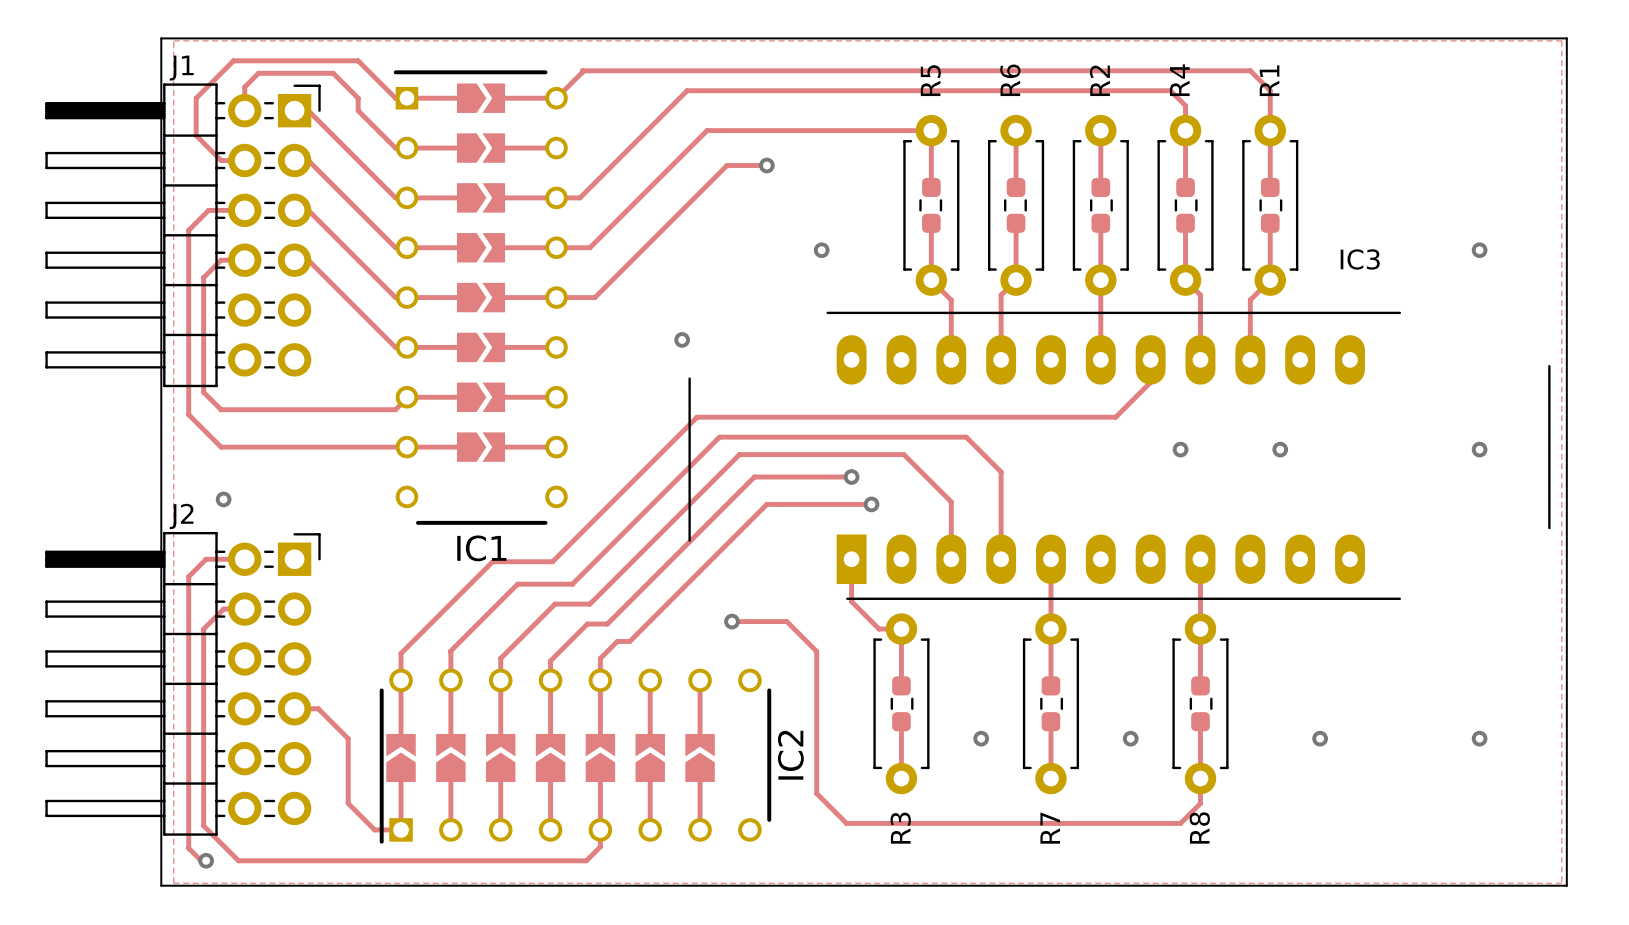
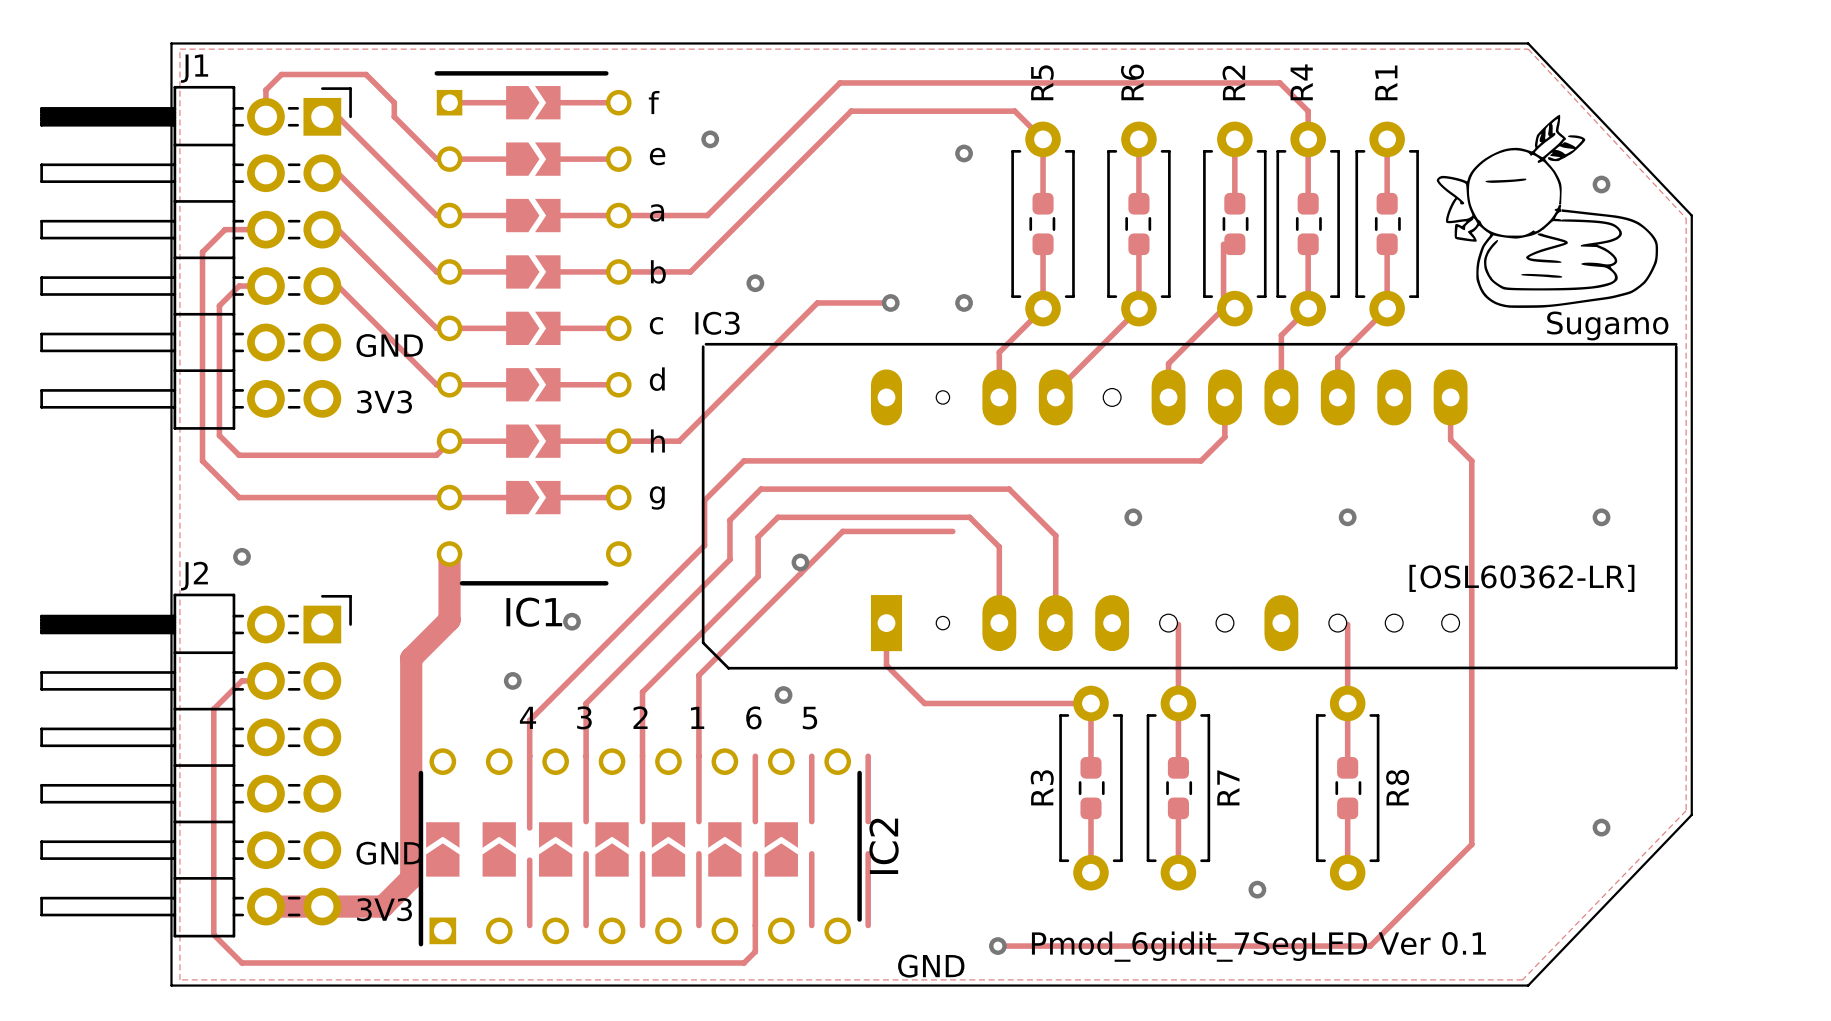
zone outline: (173, 40) (1561, 40) (1561, 883) (173, 883) (173, 40) -> (179, 49) (179, 979) (1522, 979) (1686, 810) (1686, 218) (1528, 49) (179, 49)
board edge: (161, 45) (161, 38) (1566, 38) (1566, 885) (161, 885) (161, 878) -> (171, 43) (1528, 43) (1691, 215) (1691, 814) (1528, 985) (171, 985)
track: (406, 98) (395, 98) (358, 60) (233, 60) (196, 98) (196, 135) (221, 160) (244, 160) -> none
track: (556, 98) (582, 70) (1250, 70) (1270, 90) (1270, 187) -> none
text: none -> f (654, 102)
drawing: none -> [1436, 114, 1659, 308]
via: none -> (710, 139)
track: (931, 130) (707, 130) (589, 247) -> (1043, 139) (1014, 111) (851, 111) (690, 271) (656, 271)
track: none -> (1387, 139) (1387, 203)
via: none -> (964, 153)
text: none -> e (657, 156)
track: (766, 165) (726, 165) (594, 297) (556, 297) -> none
via: (766, 165) -> none
track: (1185, 187) (1185, 105) (1170, 90) (687, 90) (579, 197) -> (1308, 203) (1308, 111) (1279, 82) (839, 82) (707, 215) (645, 215)
text: none -> a (657, 212)
R4 position: (1185, 205) -> (1308, 223)
R1 position: (1270, 205) -> (1387, 223)
track: none -> (1223, 244) (1223, 308) (1168, 363) (1168, 397)
track: (1100, 223) (1100, 359) -> none
track: none -> (1308, 244) (1308, 308) (1281, 335) (1281, 397)
track: (1185, 223) (1185, 280) (1200, 295) (1200, 359) -> none
track: none -> (1387, 244) (1387, 308) (1337, 357) (1337, 397)
track: (1270, 223) (1270, 280) (1250, 300) (1250, 359) -> none
text: none -> b (658, 271)
via: (821, 250) -> none
via position: (1479, 250) -> (1601, 184)
via: none -> (755, 283)
IC3 name position: IC3 (1360, 259) -> IC3 (717, 323)
track: none -> (890, 302) (817, 302) (679, 441) (618, 441)
via: none -> (890, 302)
via: none -> (964, 302)
track: (931, 280) (951, 300) (951, 359) -> (1043, 308) (999, 352) (999, 397)
text: none -> c (656, 325)
track: (1001, 295) (1001, 359) -> (1122, 325) (1055, 391) (1055, 397)
text: none -> Sugamo (1607, 325)
IC3 footprint: [688, 311, 1551, 600] -> [701, 342, 1678, 670]
text: none -> GND (389, 345)
via: (682, 339) -> none
text: none -> d (657, 379)
track: none -> (1450, 397) (1450, 439) (1471, 460) (1471, 844) (1370, 946) (997, 946)
track: (1150, 359) (1150, 382) (1115, 417) (697, 417) (552, 561) (492, 561) (401, 653) (401, 743) -> none
text: none -> 3V3 (384, 401)
track: none -> (1224, 408) (1224, 437) (1200, 460) (744, 460) (704, 500) (704, 545) (529, 720) (529, 827)
text: none -> h (657, 440)
text: none -> g (657, 497)
via position: (1180, 449) -> (1347, 517)
via: (1280, 449) -> none
via position: (1479, 449) -> (1601, 517)
via: none -> (1133, 517)
via: (851, 477) -> none
track: none -> (449, 554) (449, 620) (411, 658) (411, 878) (383, 906) (265, 906)
track: (654, 501) (719, 437) (966, 437) (1001, 472) (1001, 559) -> (729, 559) (729, 520) (760, 489) (1009, 489) (1055, 535) (1055, 623)
via: none -> (800, 562)
track: (871, 504) (766, 504) (629, 641) (617, 641) (600, 658) (600, 738) -> none
via: (871, 504) -> none
text: none -> [OSL60362-LR] (1521, 578)
via: none -> (572, 621)
track: none -> (999, 623) (999, 546) (969, 517) (777, 517) (758, 537) (758, 576) (642, 692) (642, 821)
track: (244, 559) (206, 559) (188, 576) (188, 848) (201, 860) (206, 860) -> none
track: (851, 559) (851, 601) (879, 629) -> (886, 623) (886, 665) (924, 703) (983, 703)
track: (951, 559) (951, 501) (903, 454) (739, 454) (589, 604) (555, 604) (500, 658) (500, 738) -> none
track: (572, 584) (517, 584) (450, 651) (450, 738) -> (636, 652) (586, 703) (586, 821)
track: (627, 604) (607, 624) (587, 624) (550, 660) (550, 738) -> (698, 675) (698, 821)
via: none -> (512, 680)
track: (731, 621) (786, 621) (816, 651) (816, 793) (846, 823) (1180, 823) (1200, 803) (1200, 778) -> none
via position: (731, 621) -> (783, 695)
track: (203, 629) (203, 825) (238, 860) (586, 860) (600, 846) (600, 766) -> (219, 703) (213, 709) (213, 934) (242, 962) (744, 962) (755, 951) (755, 853)
track: (901, 629) (901, 685) -> (1009, 703) (1090, 703) (1090, 767)
text: none -> 4 (527, 717)
text: none -> 3 (584, 717)
text: none -> 2 (640, 717)
text: none -> 1 (697, 717)
text: none -> 6 (753, 717)
text: none -> 5 (810, 718)
track: none -> (755, 756) (755, 821)
track: (650, 680) (650, 738) -> (811, 756) (811, 821)
track: (700, 680) (700, 738) -> (868, 756) (868, 821)
R3 position: (901, 703) -> (1090, 788)
track: (294, 708) (318, 708) (348, 738) (348, 803) (374, 829) (401, 829) (401, 772) -> none
track: (901, 721) (901, 778) -> (1090, 808) (1090, 872)
via: (981, 738) -> none
via position: (1130, 738) -> (1257, 889)
via: (1320, 738) -> none
via: none -> (1601, 827)
via: (1479, 738) -> none
text: none -> GND (389, 853)
track: (450, 766) (450, 829) -> (586, 853) (586, 925)
track: (500, 766) (500, 829) -> (642, 853) (642, 925)
track: (550, 766) (550, 829) -> (698, 853) (698, 925)
track: (650, 766) (650, 829) -> (811, 853) (811, 925)
track: (700, 766) (700, 829) -> (868, 853) (868, 925)
track: none -> (529, 860) (529, 925)
text: none -> 3V3 (384, 909)
R8 name position: R8 (1199, 827) -> R8 (1397, 787)
R3 name position: R3 (900, 828) -> R3 (1042, 787)
R7 name position: R7 (1050, 828) -> R7 (1228, 787)
via: none -> (997, 946)
text: none -> Pmod_6gidit_7SegLED Ver 0.1 (1258, 946)
via: (206, 860) -> none
text: none -> GND (931, 966)

